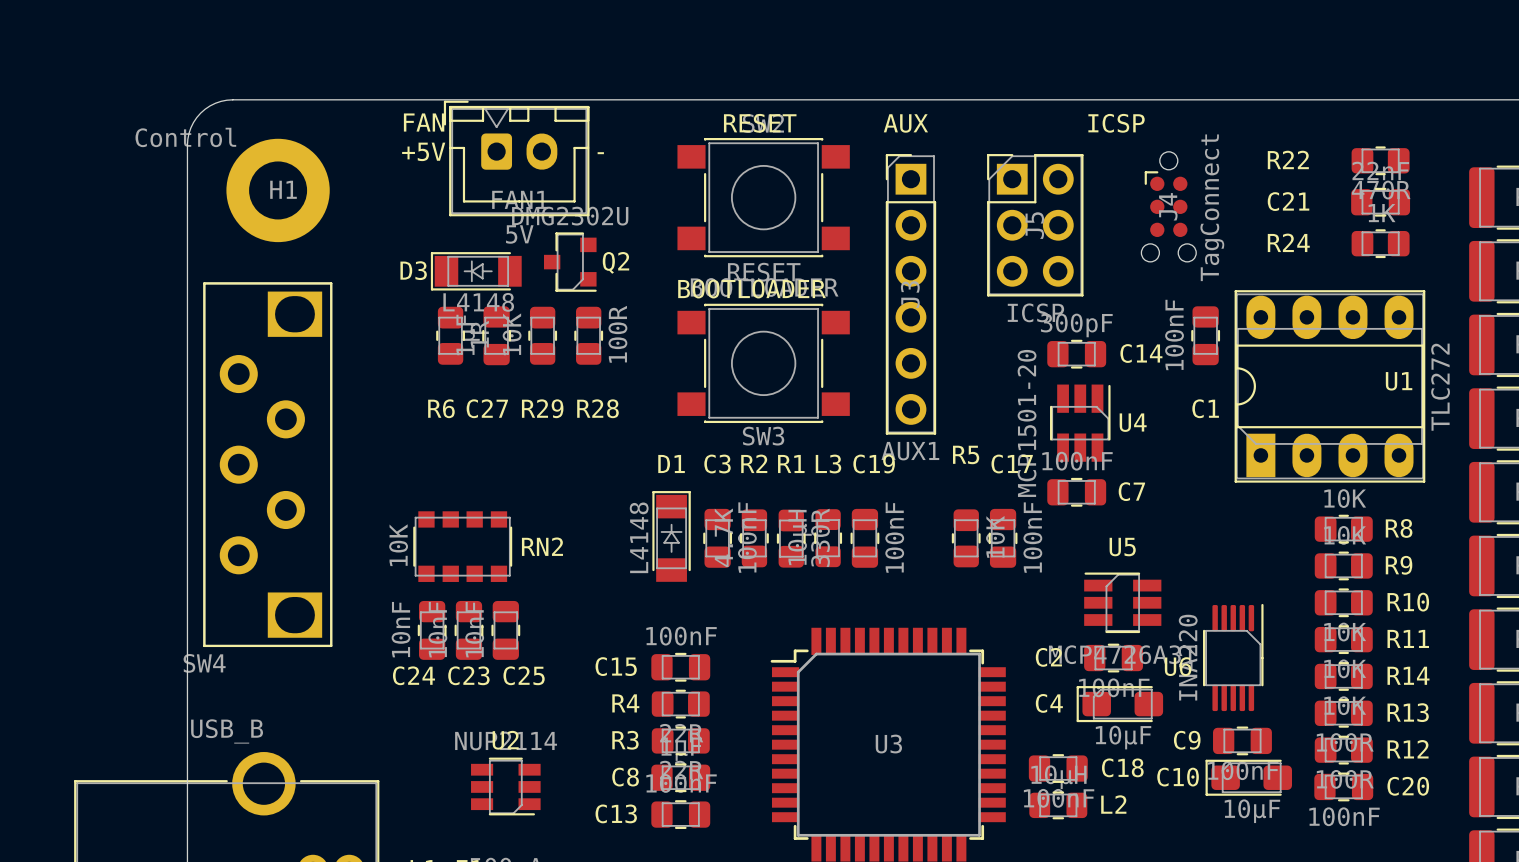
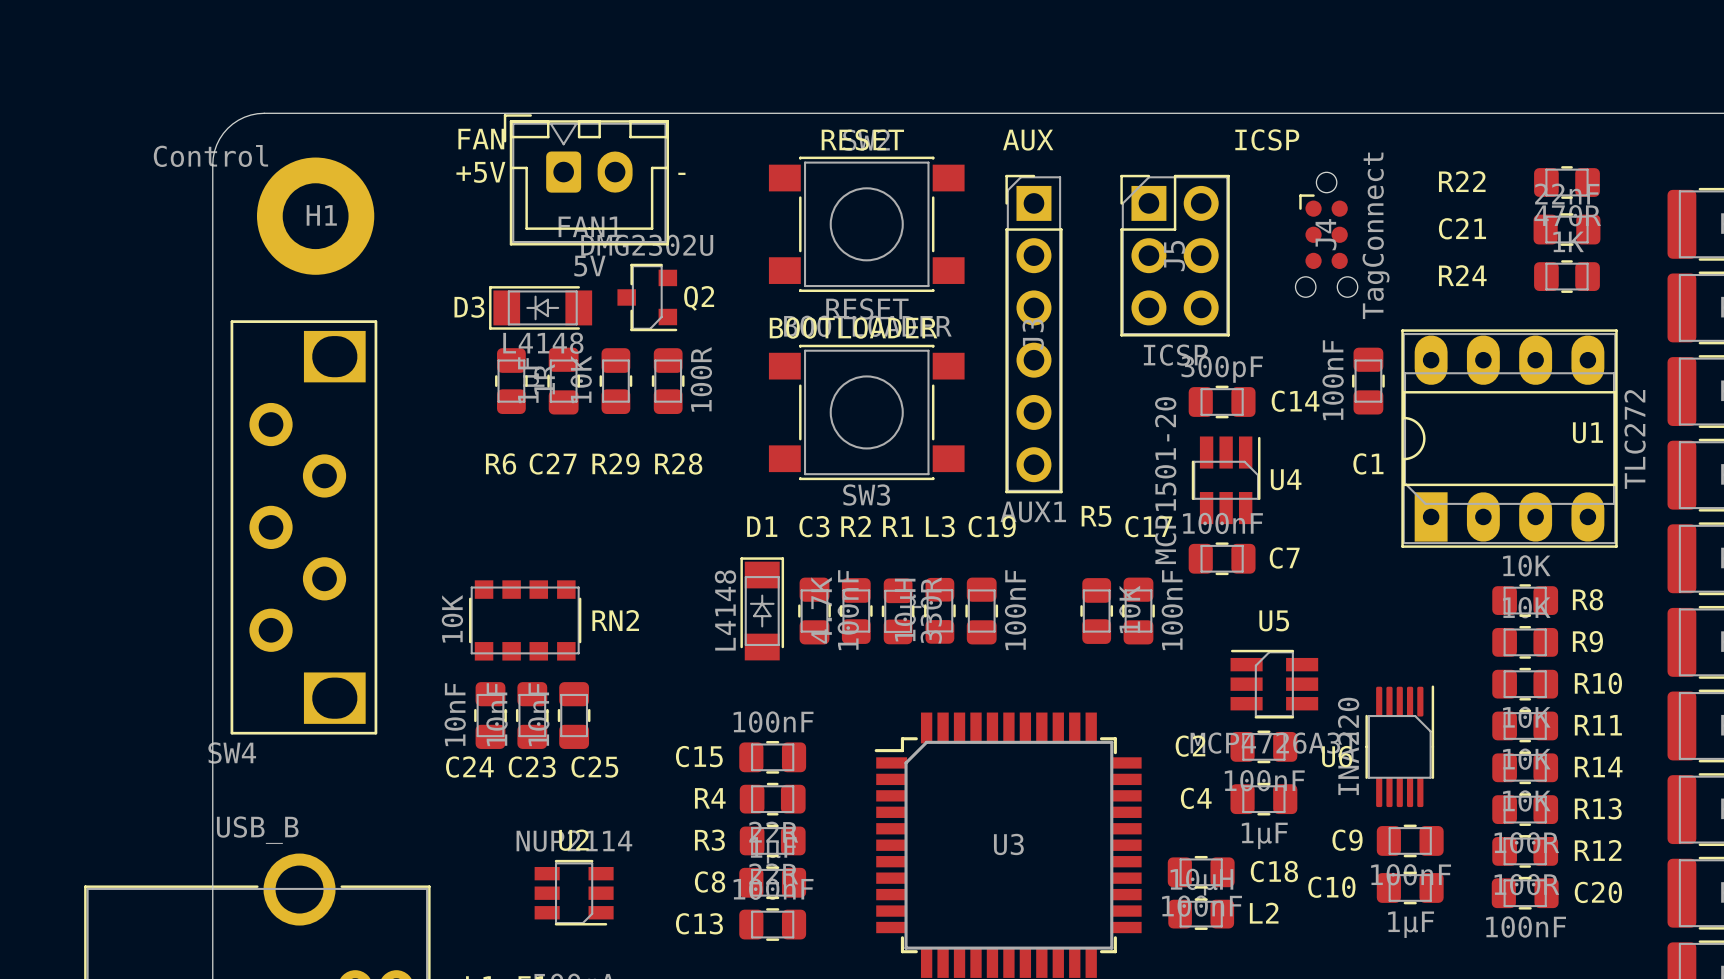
C4 footprint: [1076, 686, 1164, 723] -> [1230, 782, 1298, 816]
C4 value: 10μF (1123, 737) -> 1μF (1264, 835)
C10 footprint: [1205, 759, 1293, 796] -> [1376, 871, 1444, 905]
C10 value: 10μF (1252, 811) -> 1μF (1411, 924)

